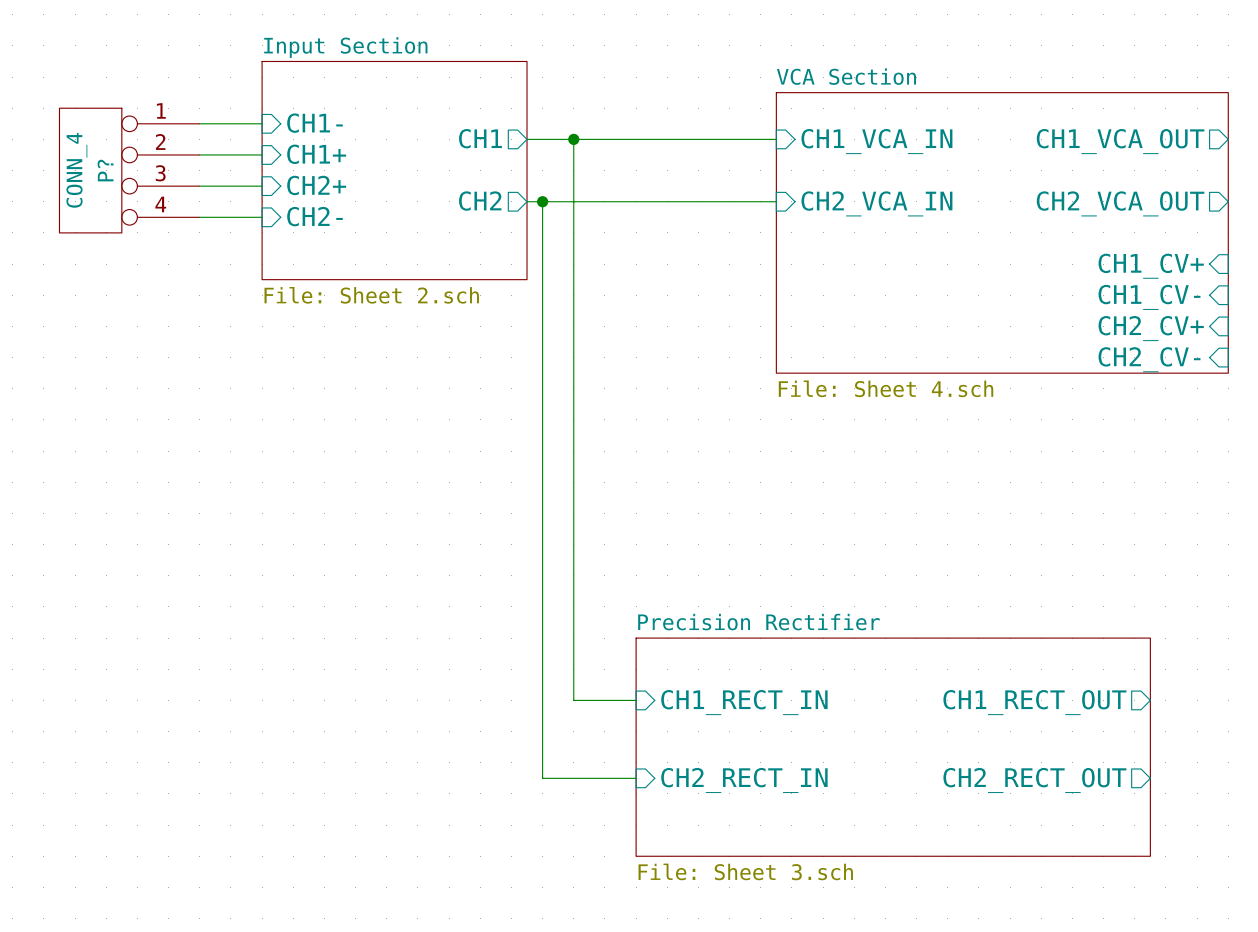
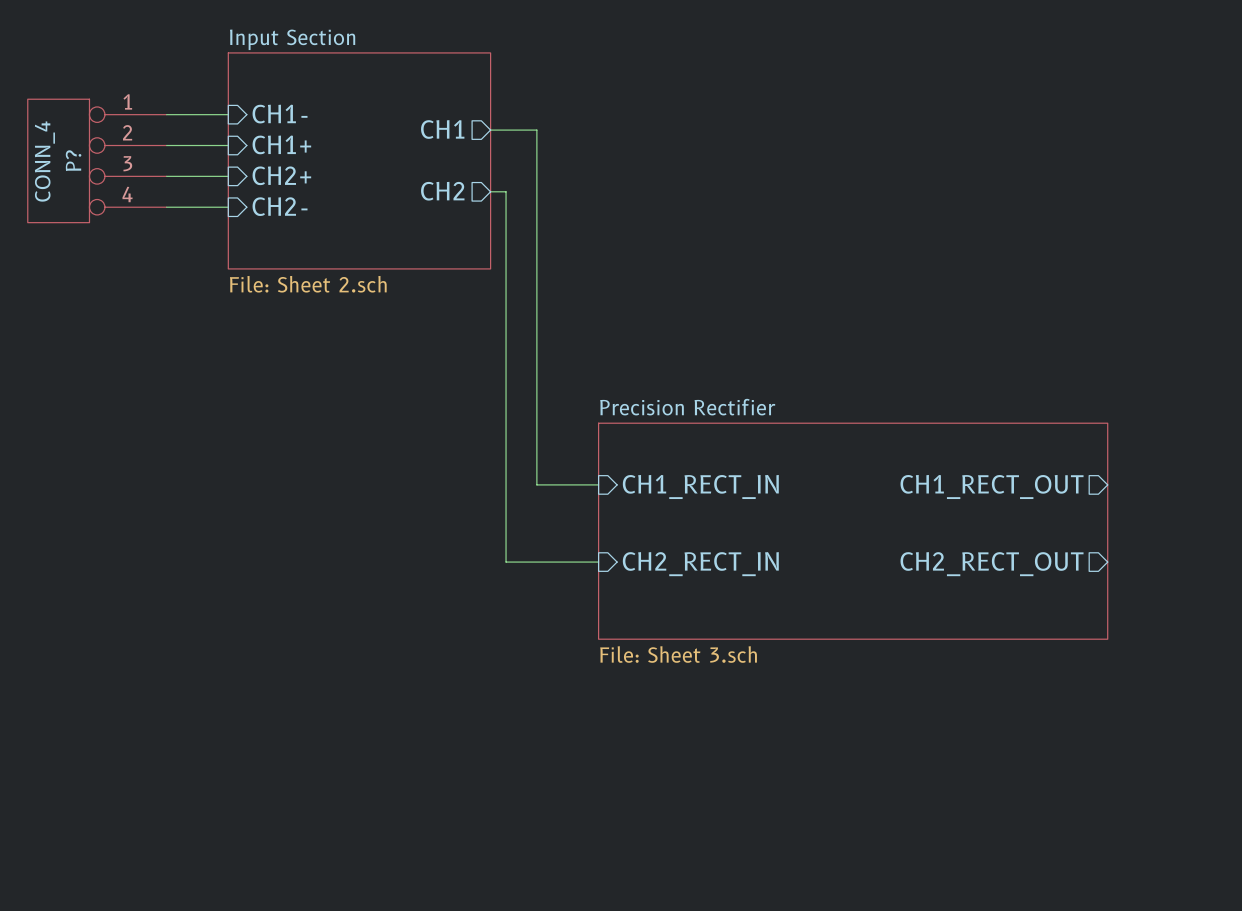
wire: (573, 139) (776, 139) -> none
junction: (573, 139) -> none
sheet pin: CH1_VCA_IN (876, 141) -> none
sheet pin: CH1_VCA_OUT (1120, 141) -> none
wire: (542, 201) (776, 201) -> none
junction: (542, 201) -> none
sheet pin: CH2_VCA_IN (876, 203) -> none
sheet pin: CH2_VCA_OUT (1120, 203) -> none
sheet VCA Section: File: Sheet 4.sch (1002, 232) -> none
sheet pin: CH1_CV+ (1151, 266) -> none
sheet pin: CH1_CV- (1149, 297) -> none
sheet pin: CH2_CV+ (1151, 328) -> none
sheet pin: CH2_CV- (1149, 359) -> none
wire: (573, 497) (573, 700) (636, 700) -> (536, 484) (598, 484)
wire: (542, 575) (542, 778) (636, 778) -> (506, 562) (598, 562)
sheet pin position: CH1_RECT_IN (744, 702) -> CH1_RECT_IN (700, 487)
sheet pin position: CH1_RECT_OUT (1034, 702) -> CH1_RECT_OUT (992, 487)
sheet Precision Rectifier position: (893, 747) -> (853, 531)
sheet pin position: CH2_RECT_IN (744, 780) -> CH2_RECT_IN (700, 564)
sheet pin position: CH2_RECT_OUT (1034, 780) -> CH2_RECT_OUT (992, 564)

